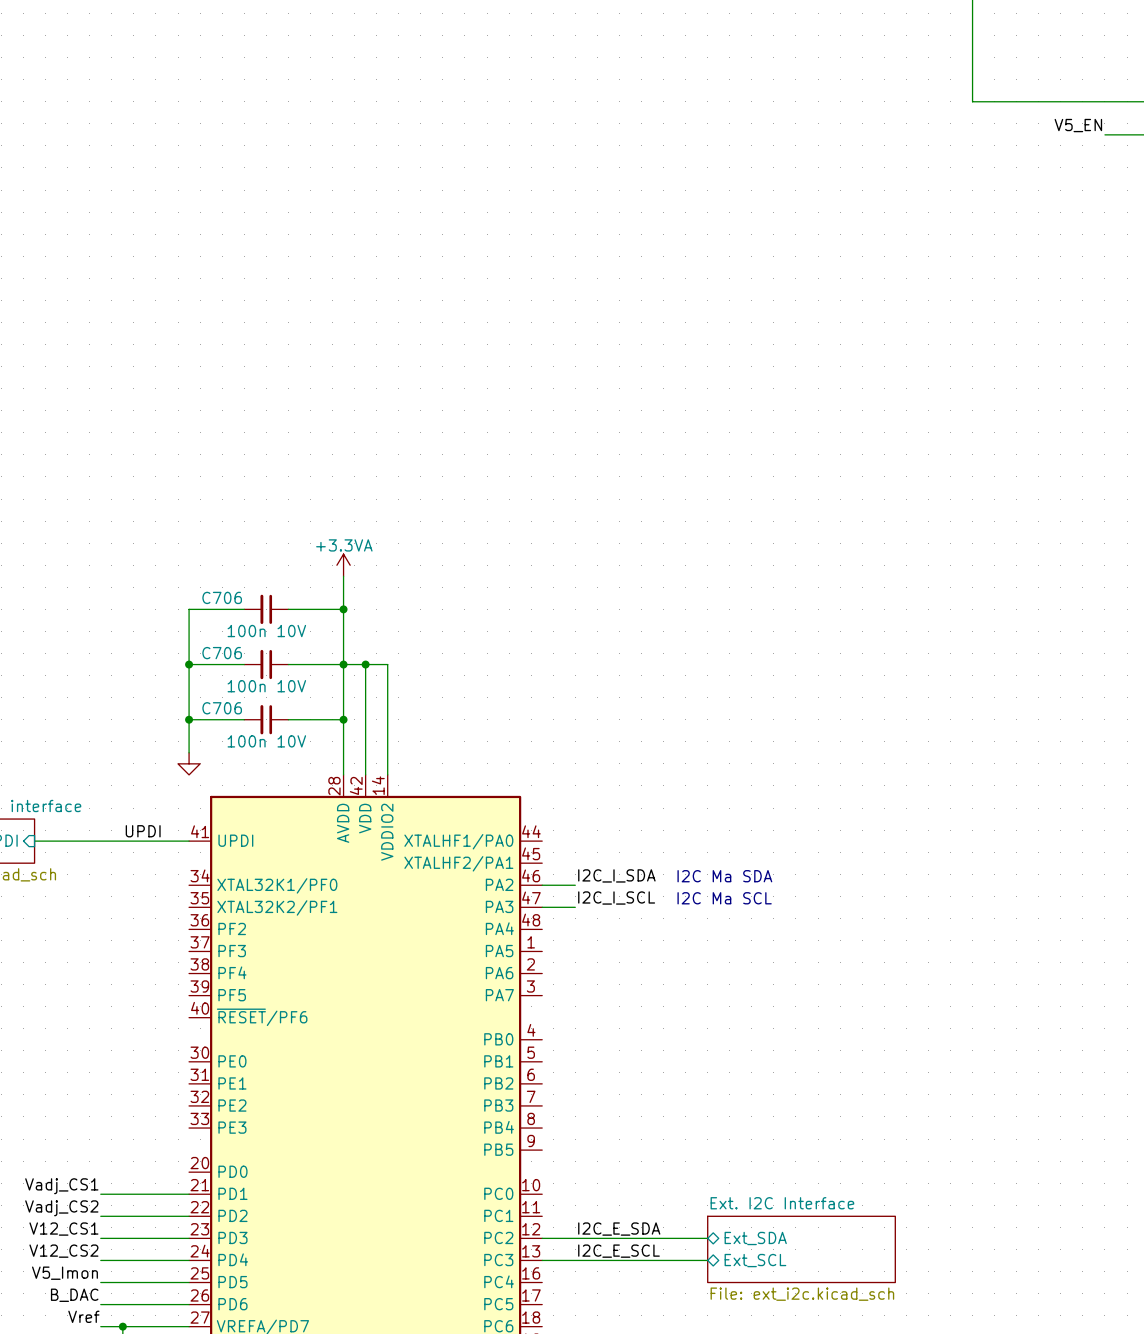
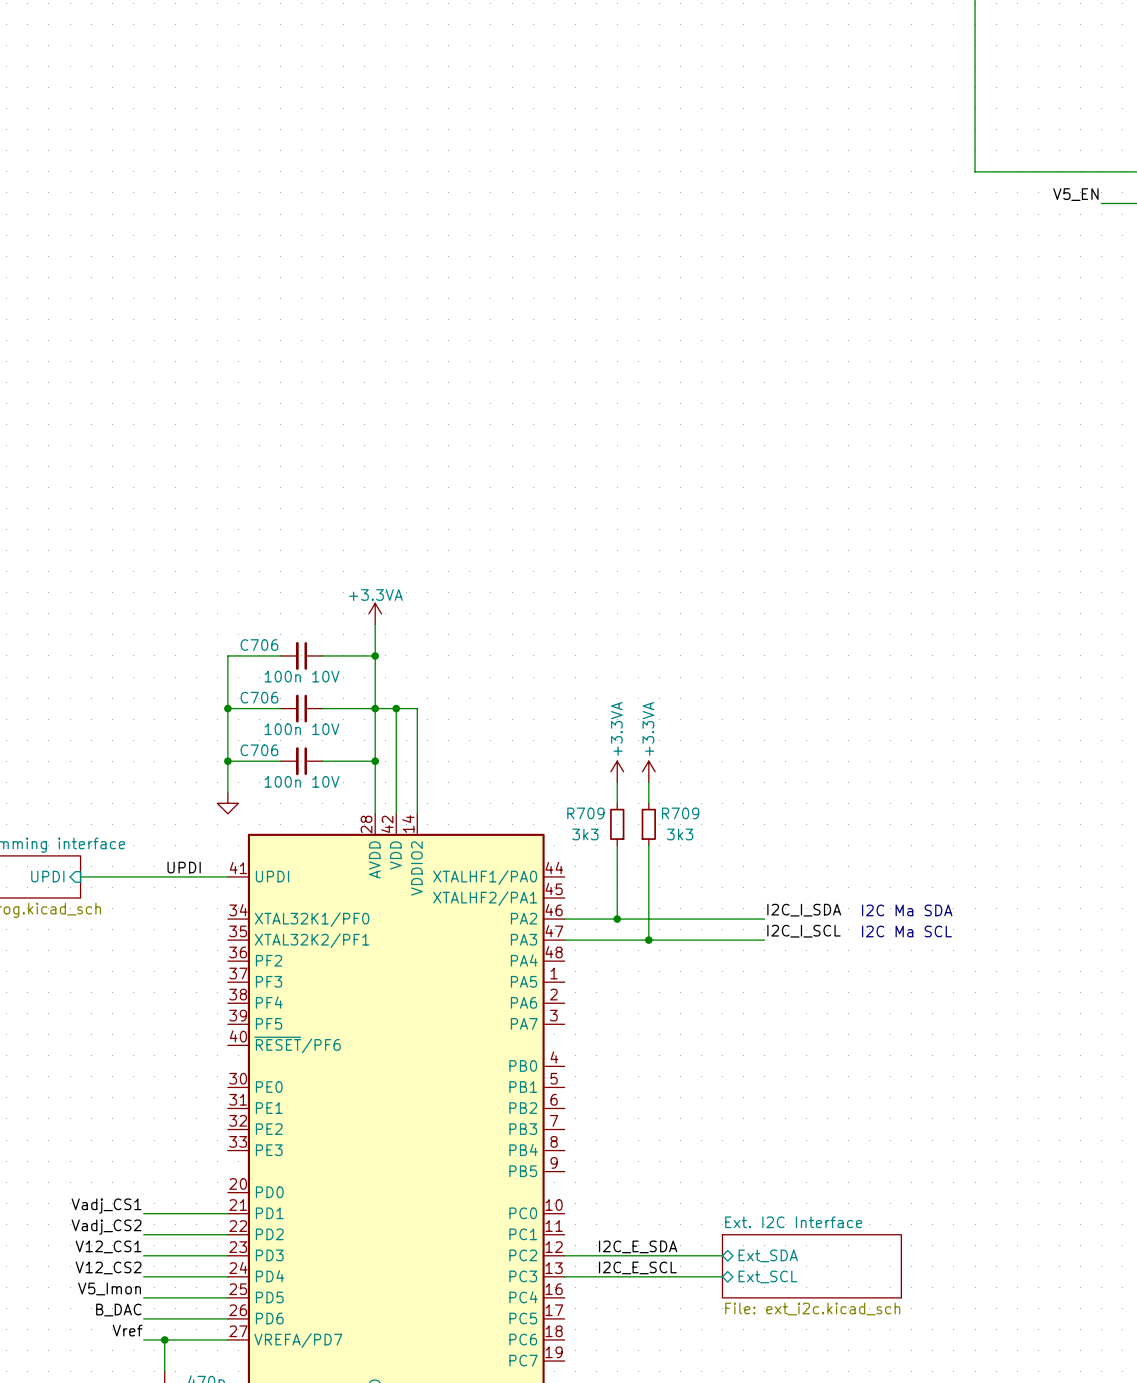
power symbol: none -> +3.3VA (617, 771)
power symbol: none -> +3.3VA (648, 771)
wire: none -> (617, 782) (617, 803)
wire: none -> (648, 782) (648, 803)
R709: none -> 3k3 (617, 824)
R709: none -> 3k3 (648, 824)
wire: none -> (617, 845) (617, 919)
wire: none -> (648, 845) (648, 940)
label position: I2C_I_SDA (616, 875) -> I2C_I_SDA (804, 910)
text position: I2C Ma SDA (724, 876) -> I2C Ma SDA (907, 910)
wire: none -> (596, 919) (764, 919)
junction: none -> (617, 919)
label position: I2C_I_SCL (616, 898) -> I2C_I_SCL (803, 931)
text position: I2C Ma SCL (724, 898) -> I2C Ma SCL (906, 931)
wire: none -> (596, 940) (764, 940)
junction: none -> (648, 940)

